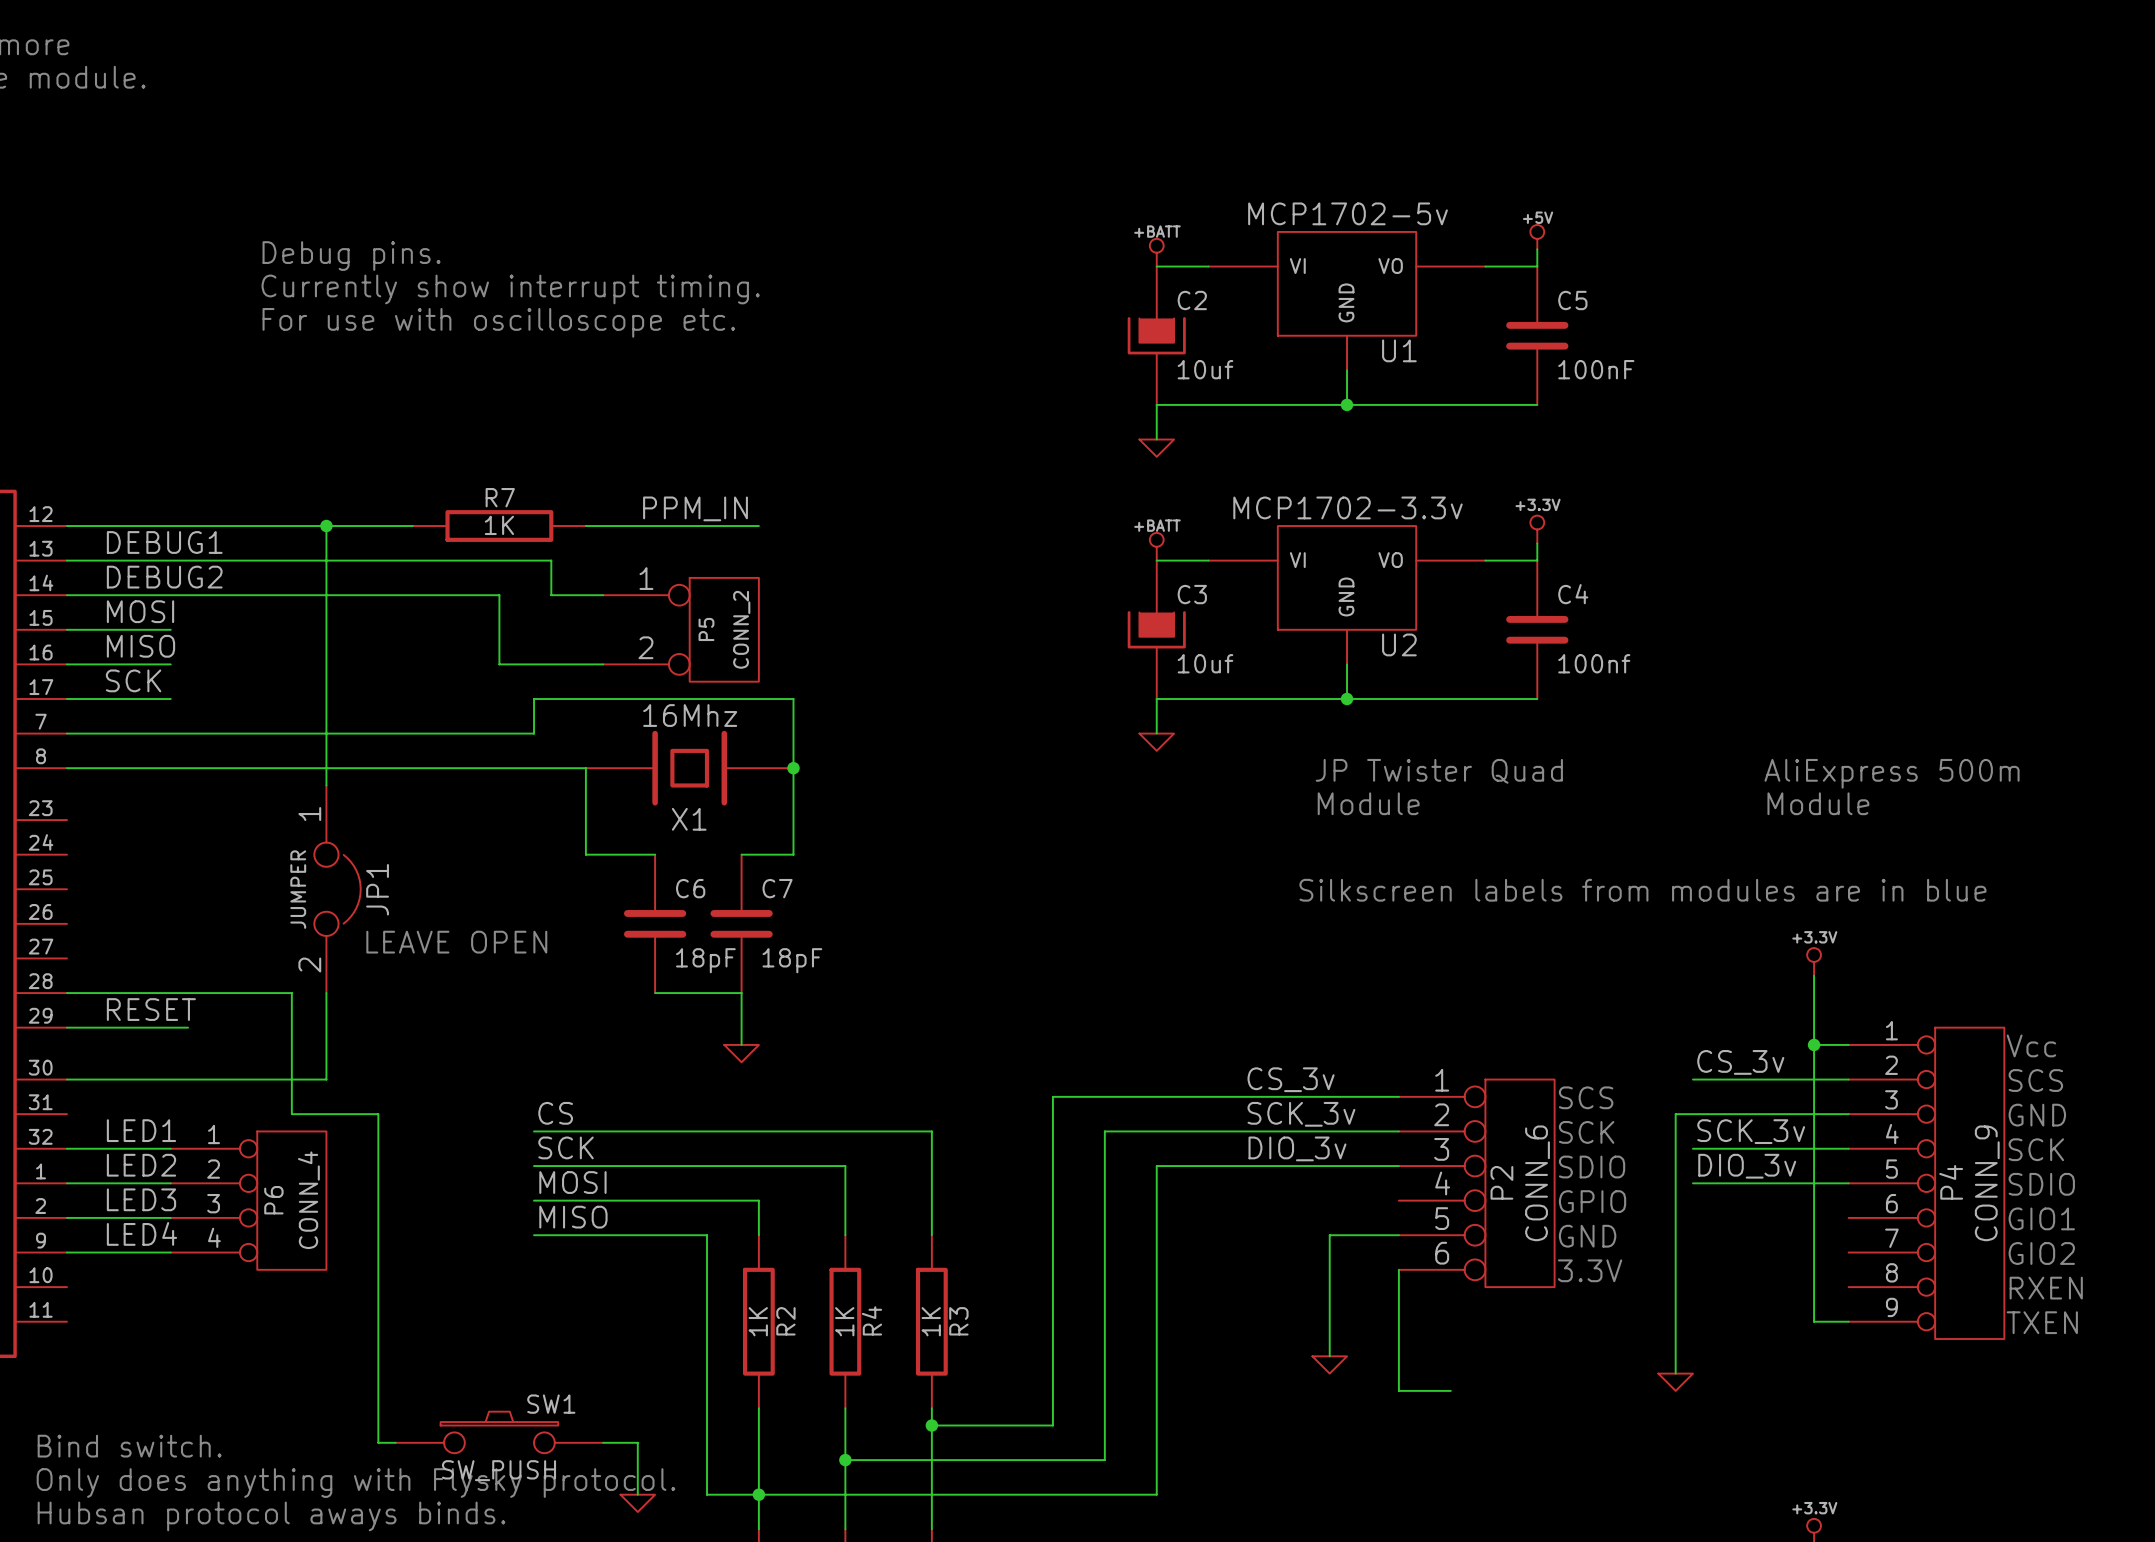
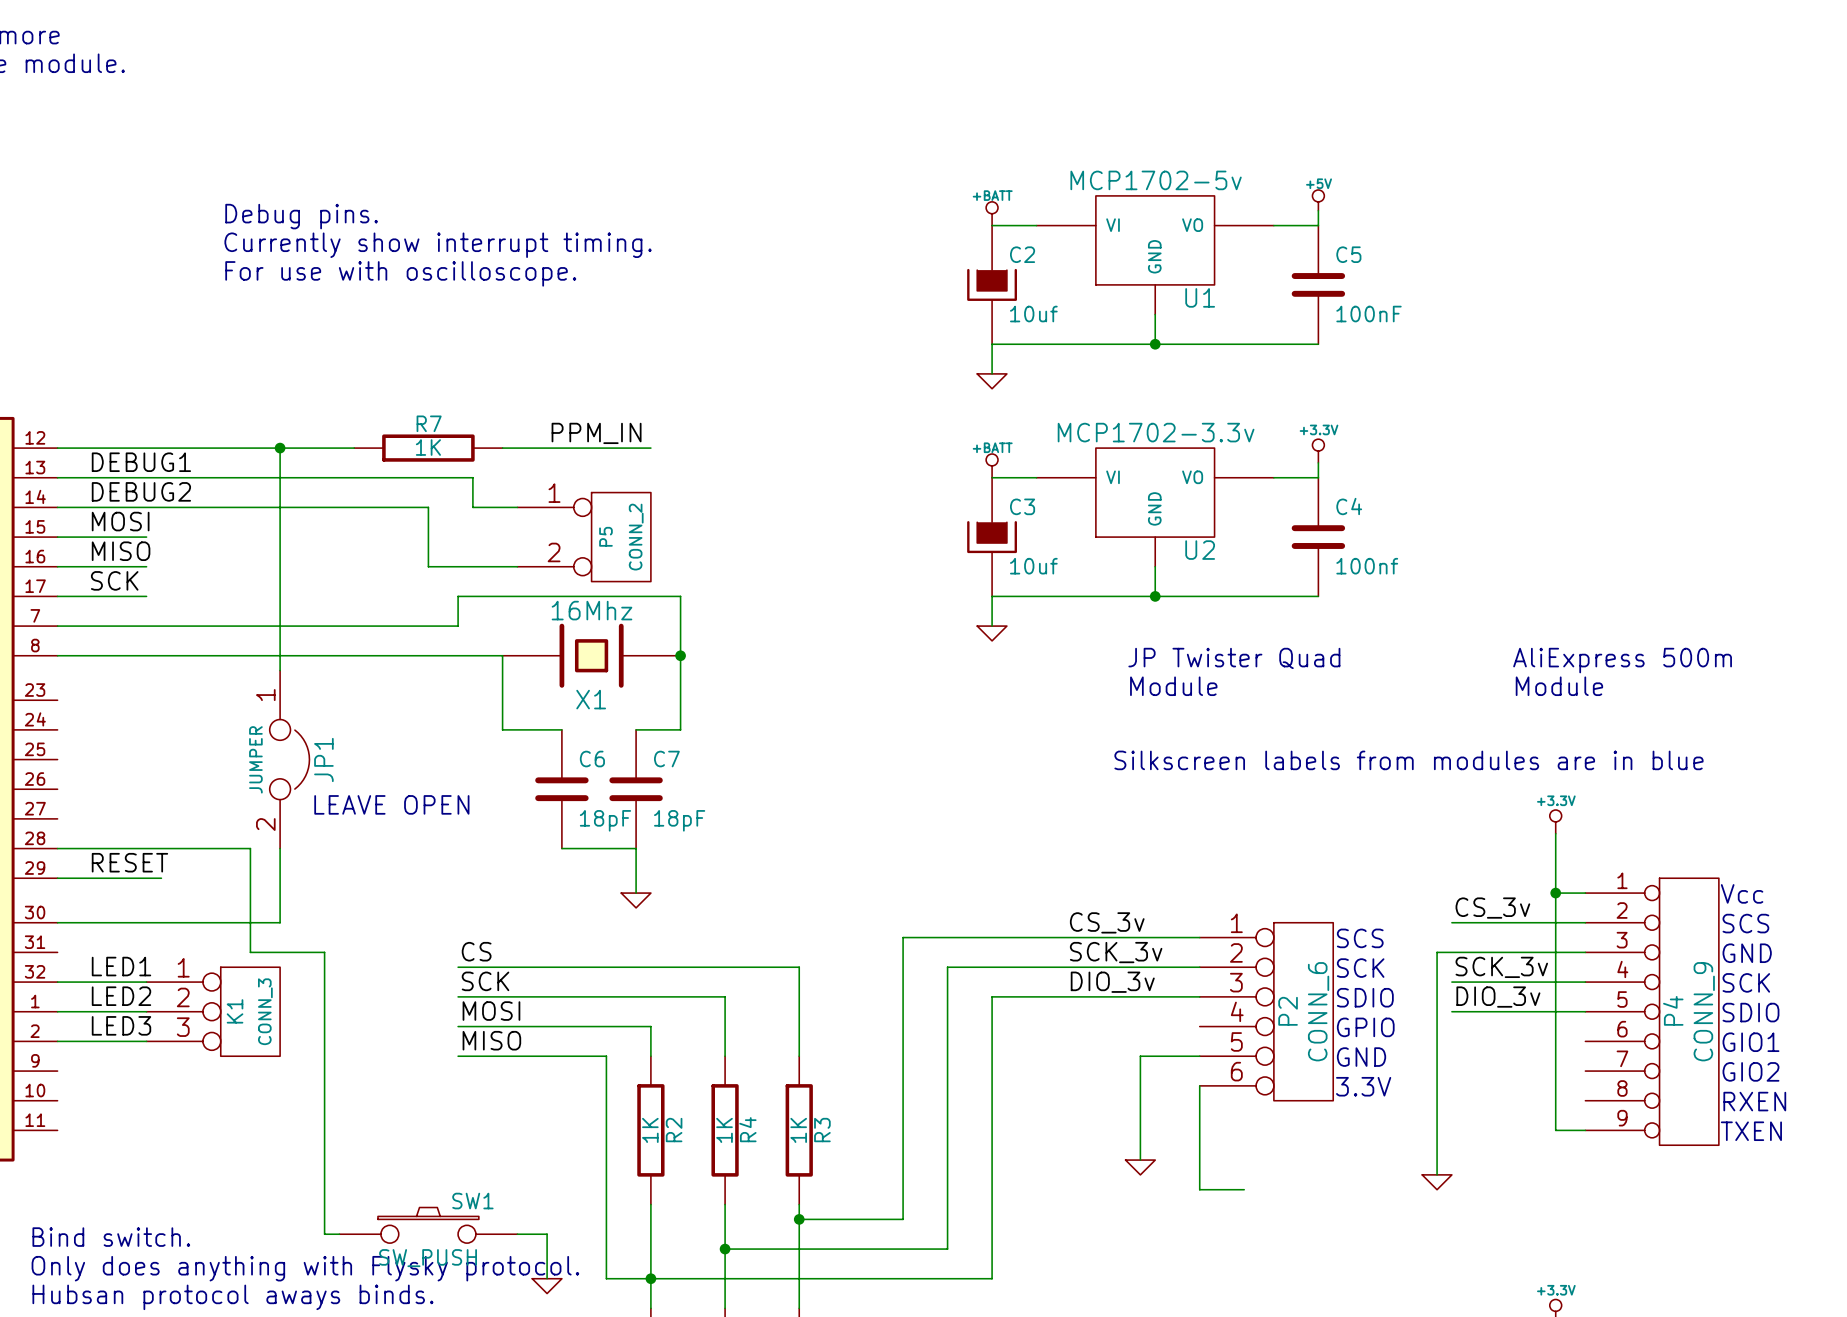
text: For use with oscilloscope etc. (498, 322) -> For use with oscilloscope. (400, 273)
K1: none -> CONN_3 (213, 1011)
P6: CONN_4 (248, 1200) -> none
label: LED4 (141, 1233) -> none
wire: (66, 1252) (170, 1252) -> none

